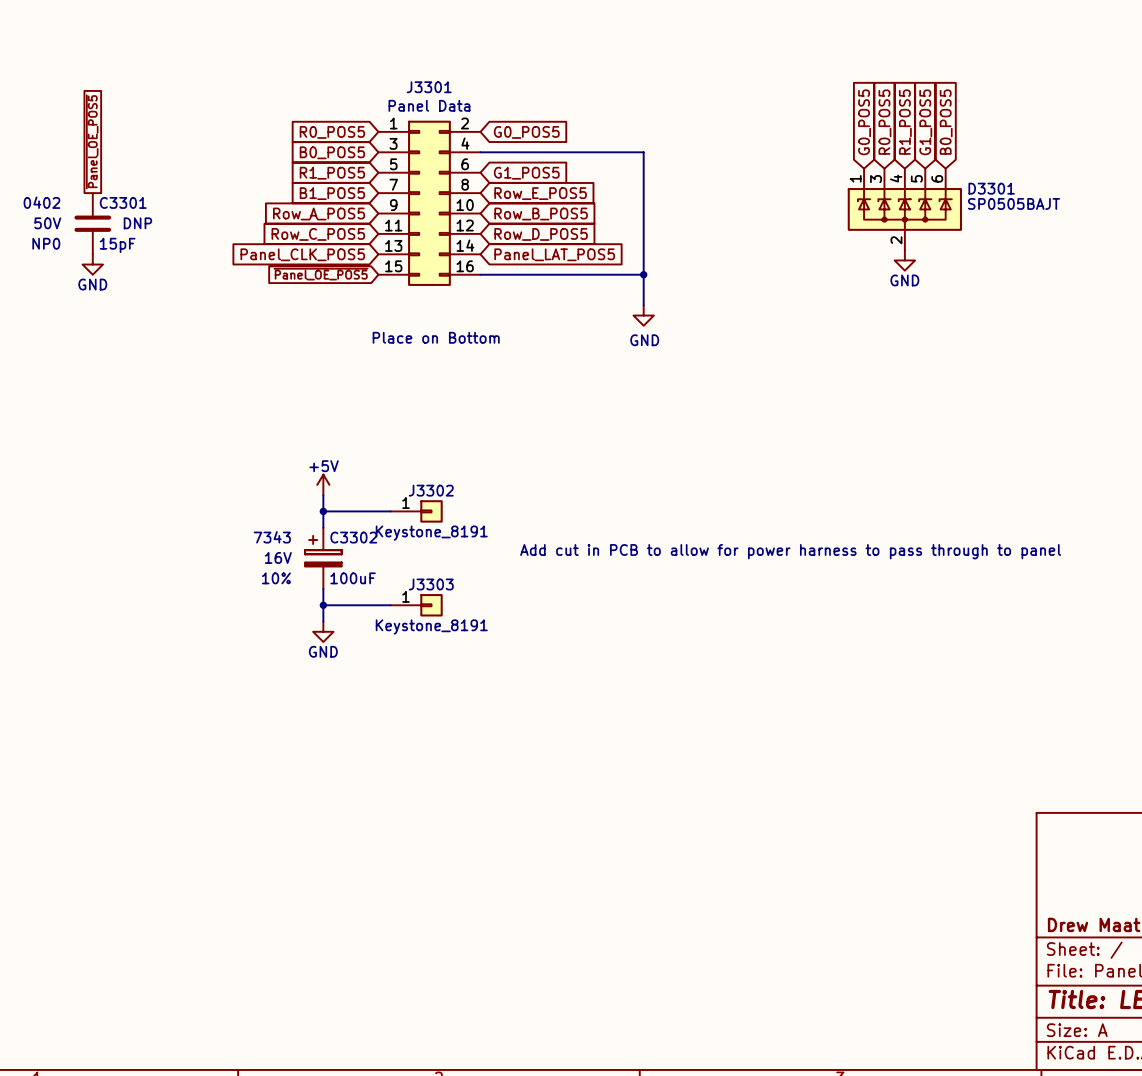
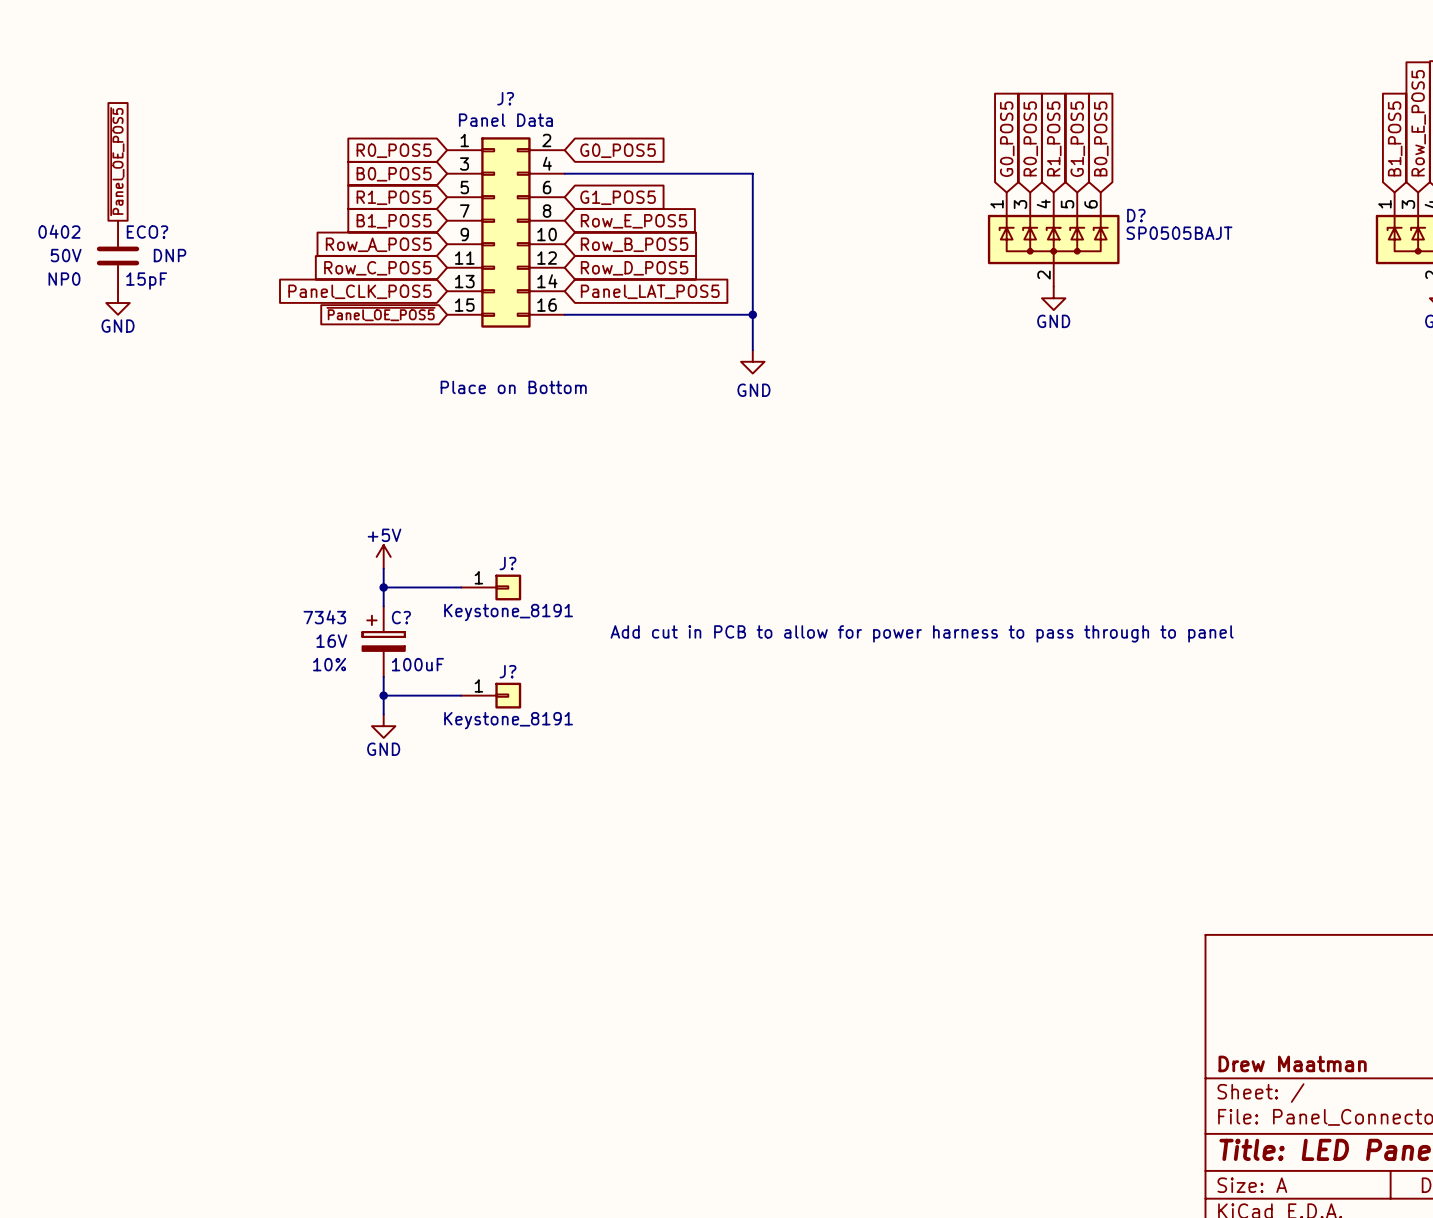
J3301 name: J3301 (429, 87) -> J? (505, 98)
D3301 name: D3301 (991, 188) -> D? (1136, 215)
C3301 name: C3301 (123, 202) -> ECO? (147, 232)
J3302 name: J3302 (431, 490) -> J? (508, 563)
C3302 name: C3302 (353, 537) -> C? (401, 617)
J3303 name: J3303 (431, 584) -> J? (508, 671)

